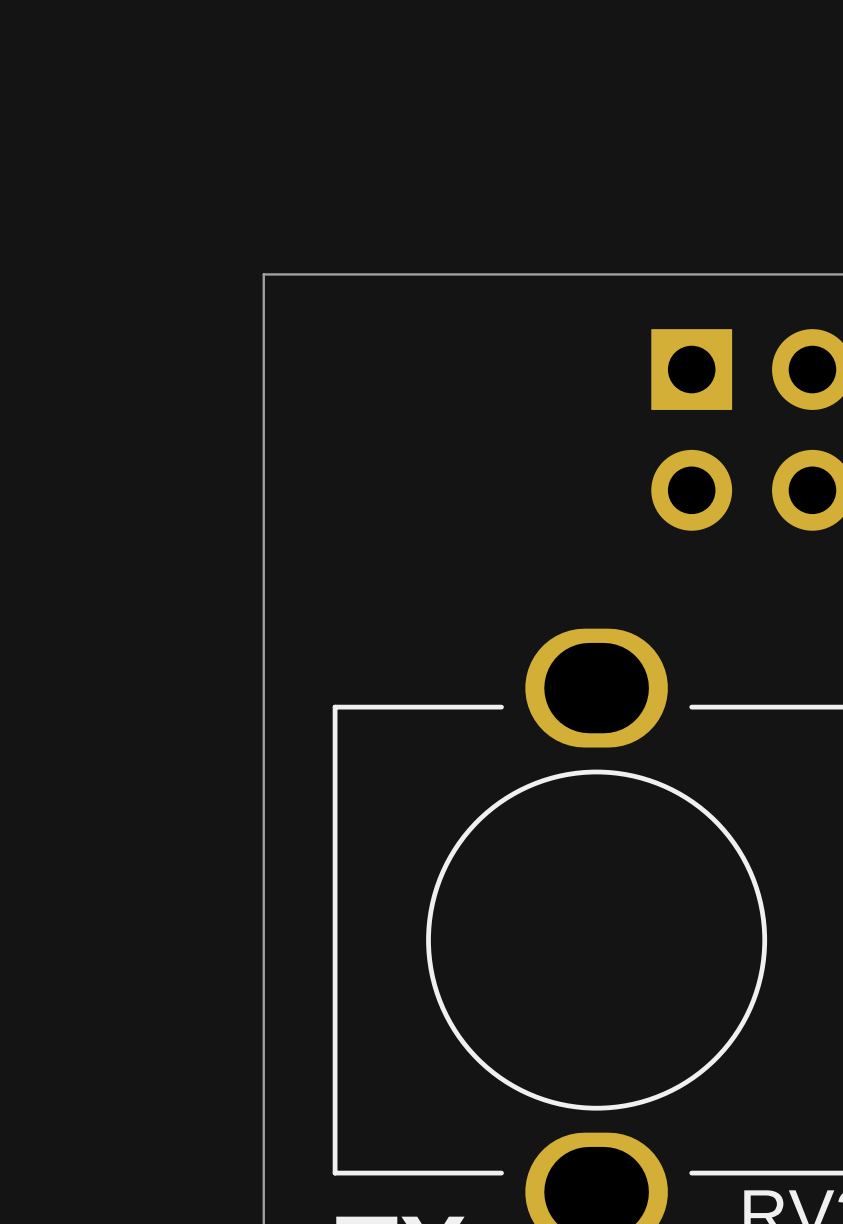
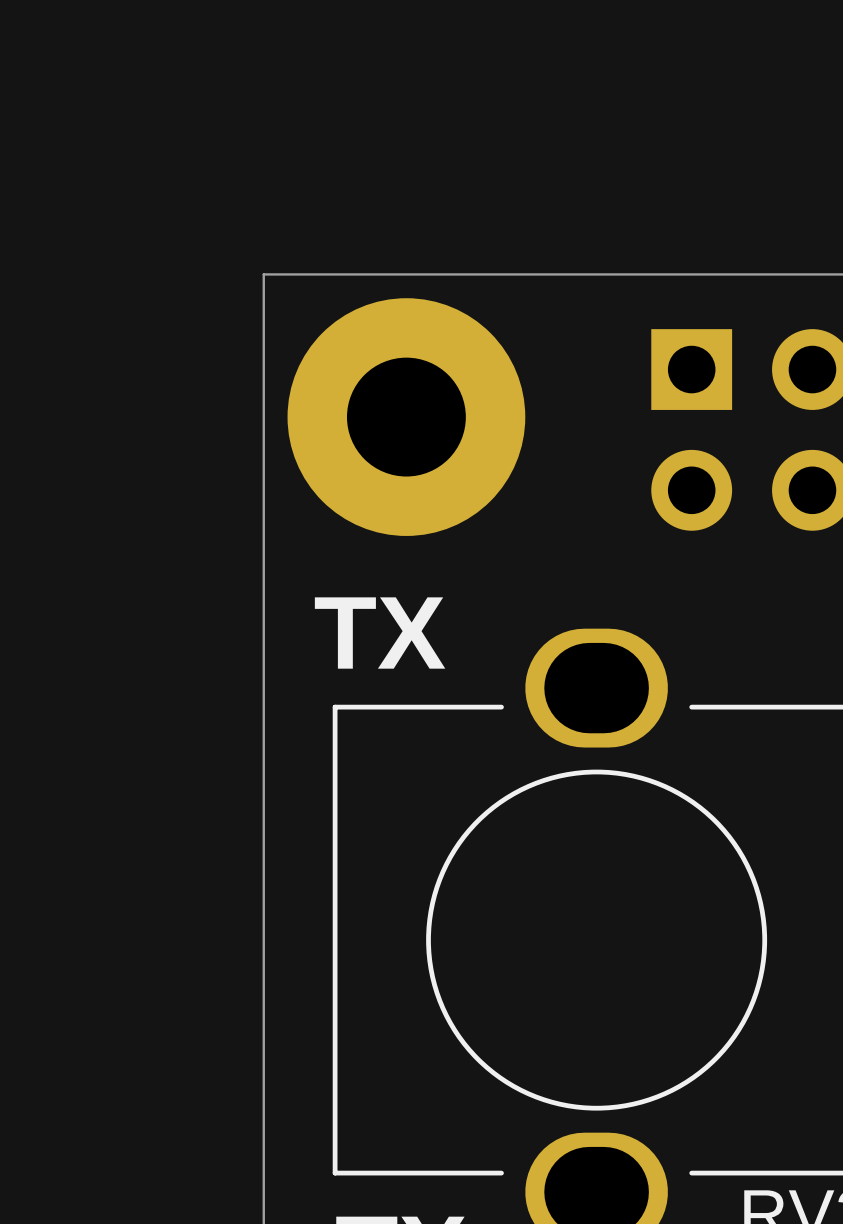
part: none -> (406, 417)
text: none -> TX (380, 633)

